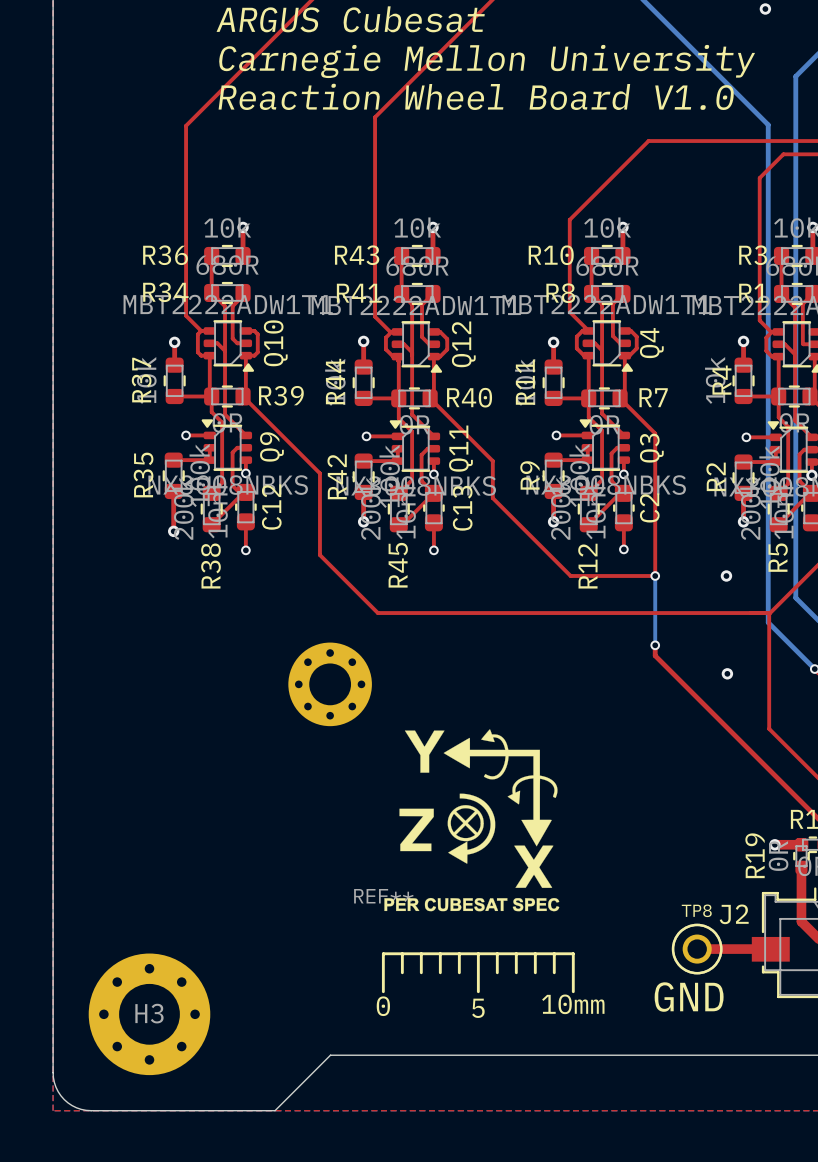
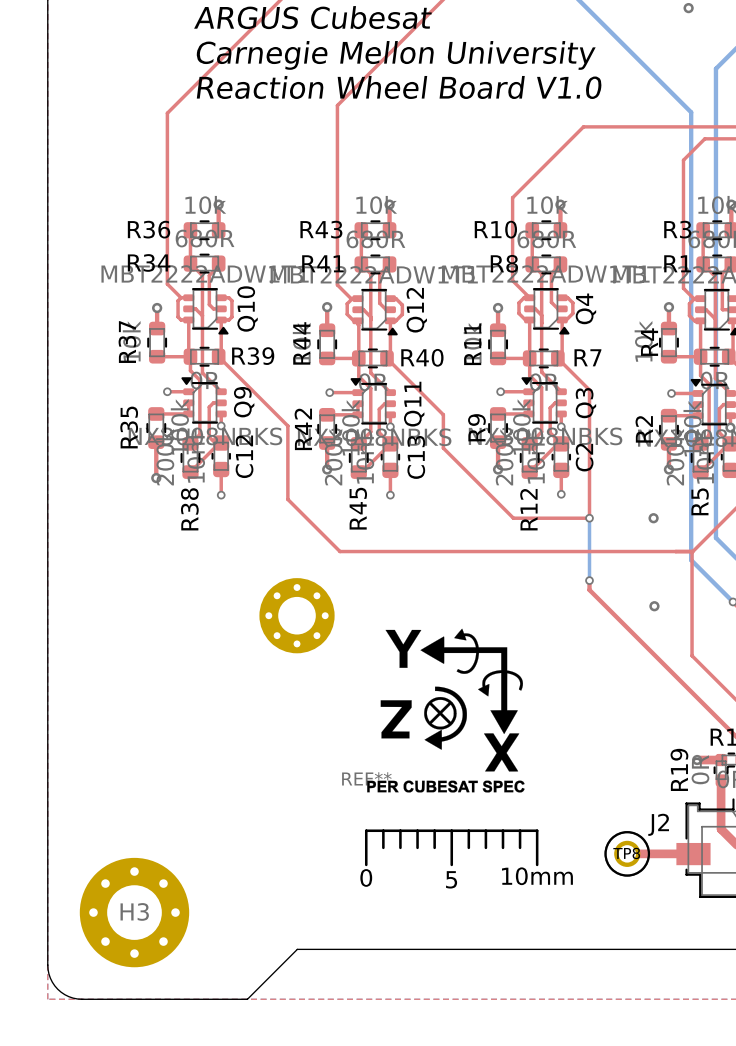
drawing position: (471, 820) -> (445, 710)
TP8 name position: TP8 (696, 910) -> TP8 (626, 853)
REF** position: (478, 972) -> (451, 847)
text: GND (689, 997) -> none

